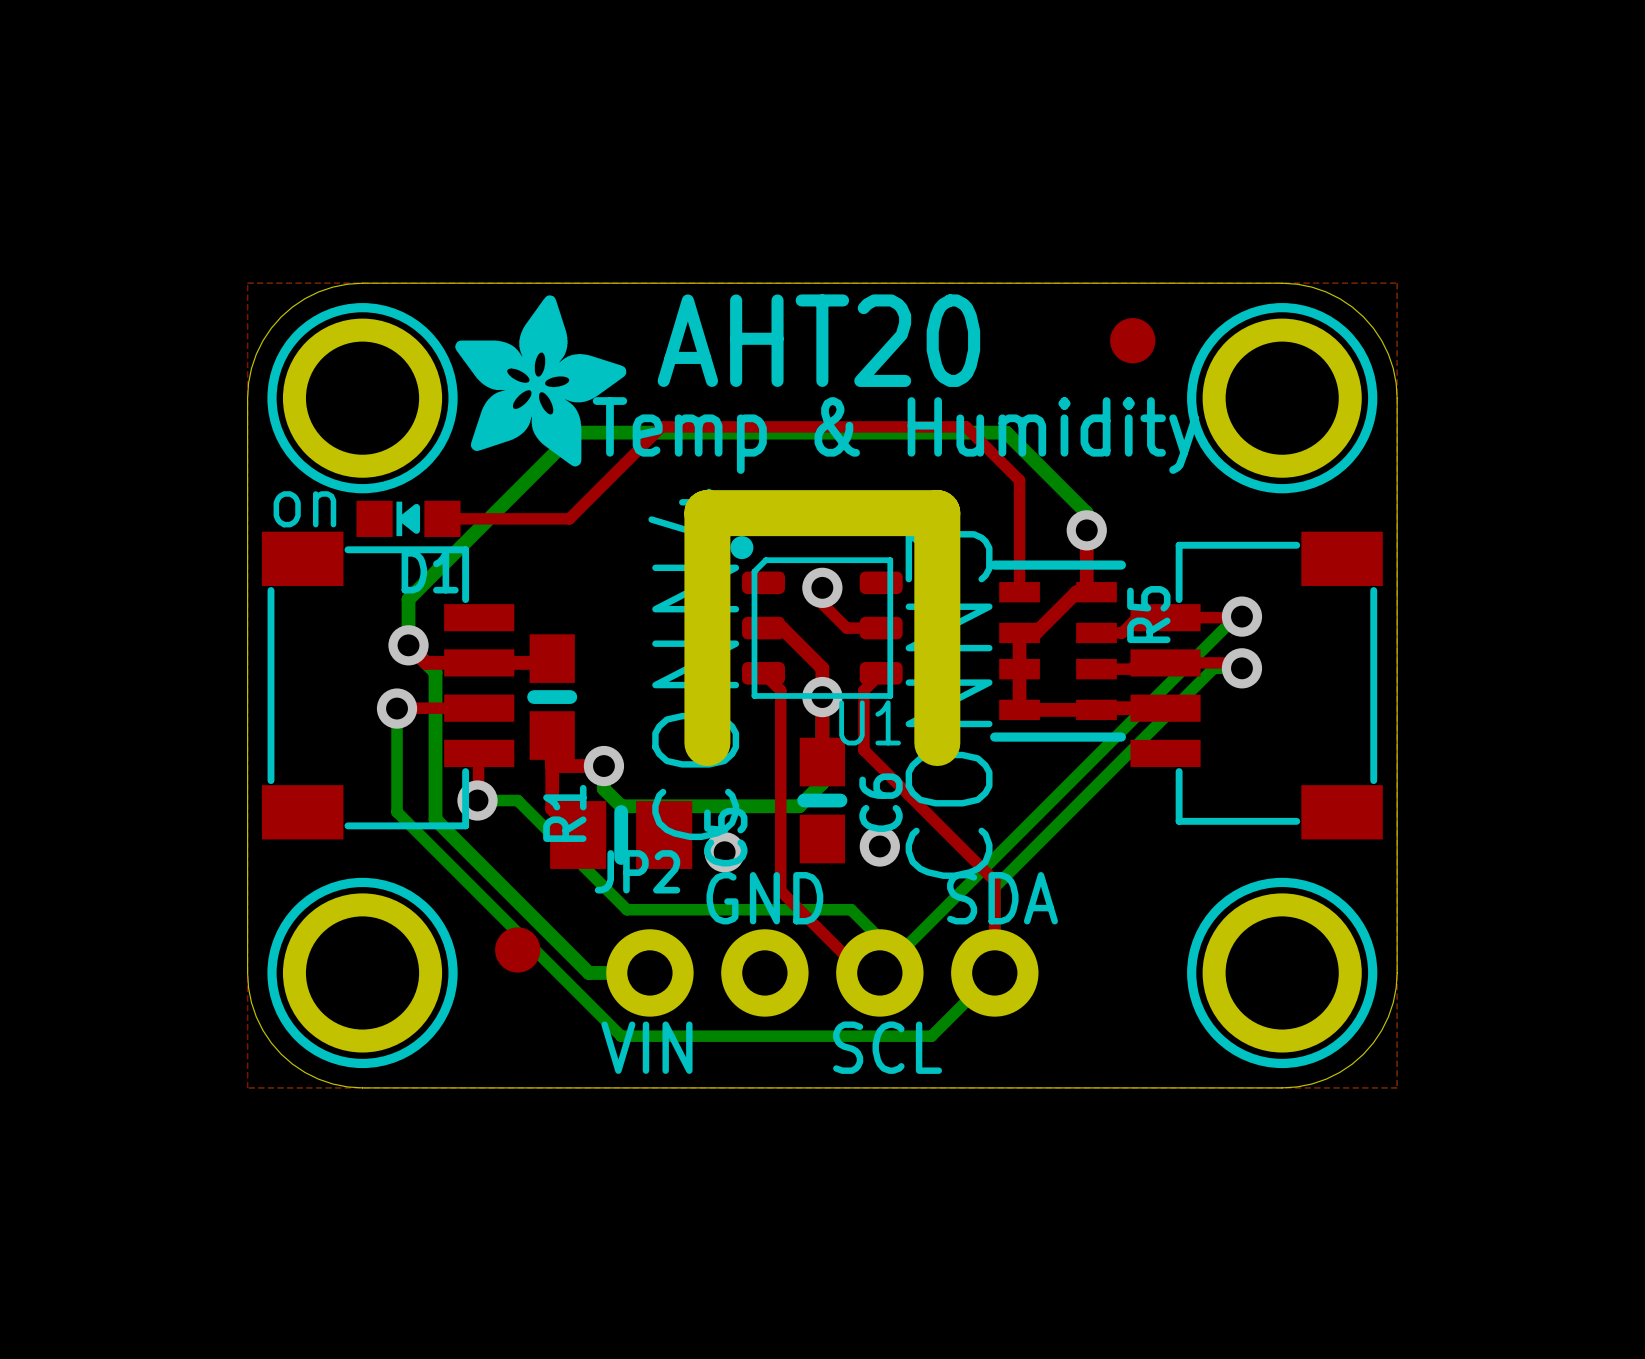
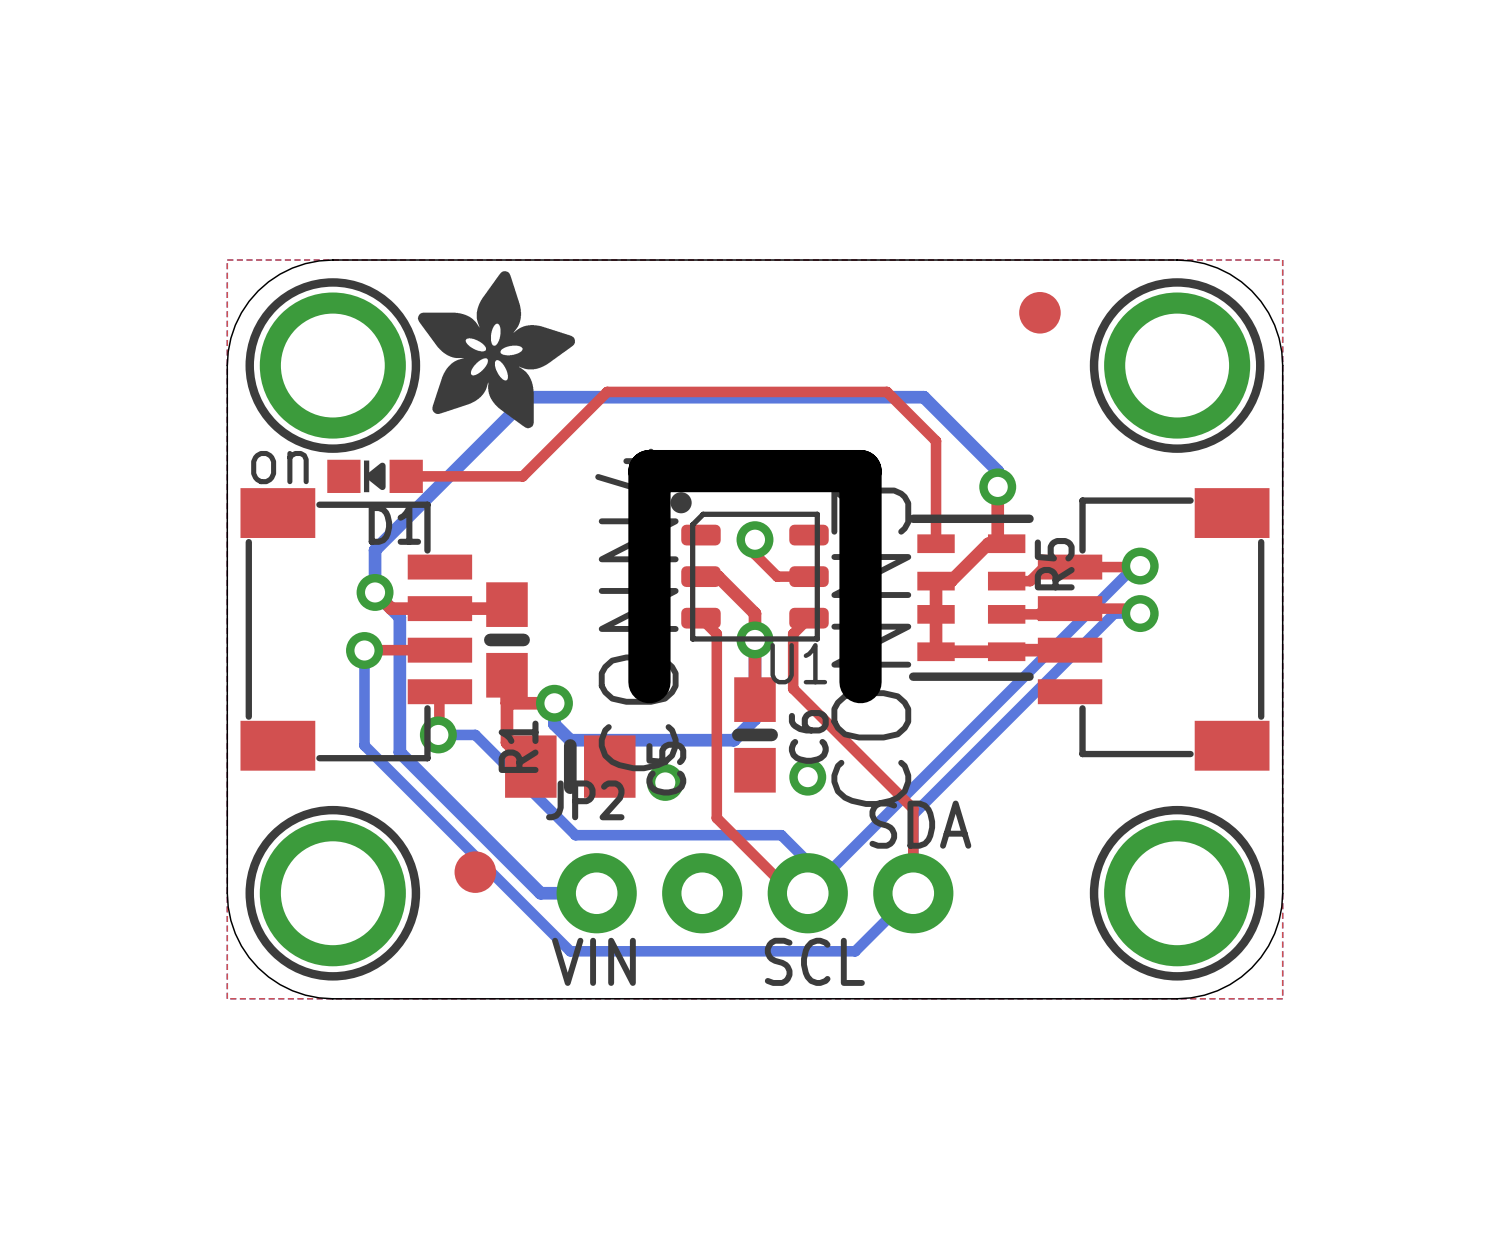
text: AHT20 (818, 340) -> none
text: Temp & Humidity (895, 435) -> none
text: GND (764, 898) -> none

